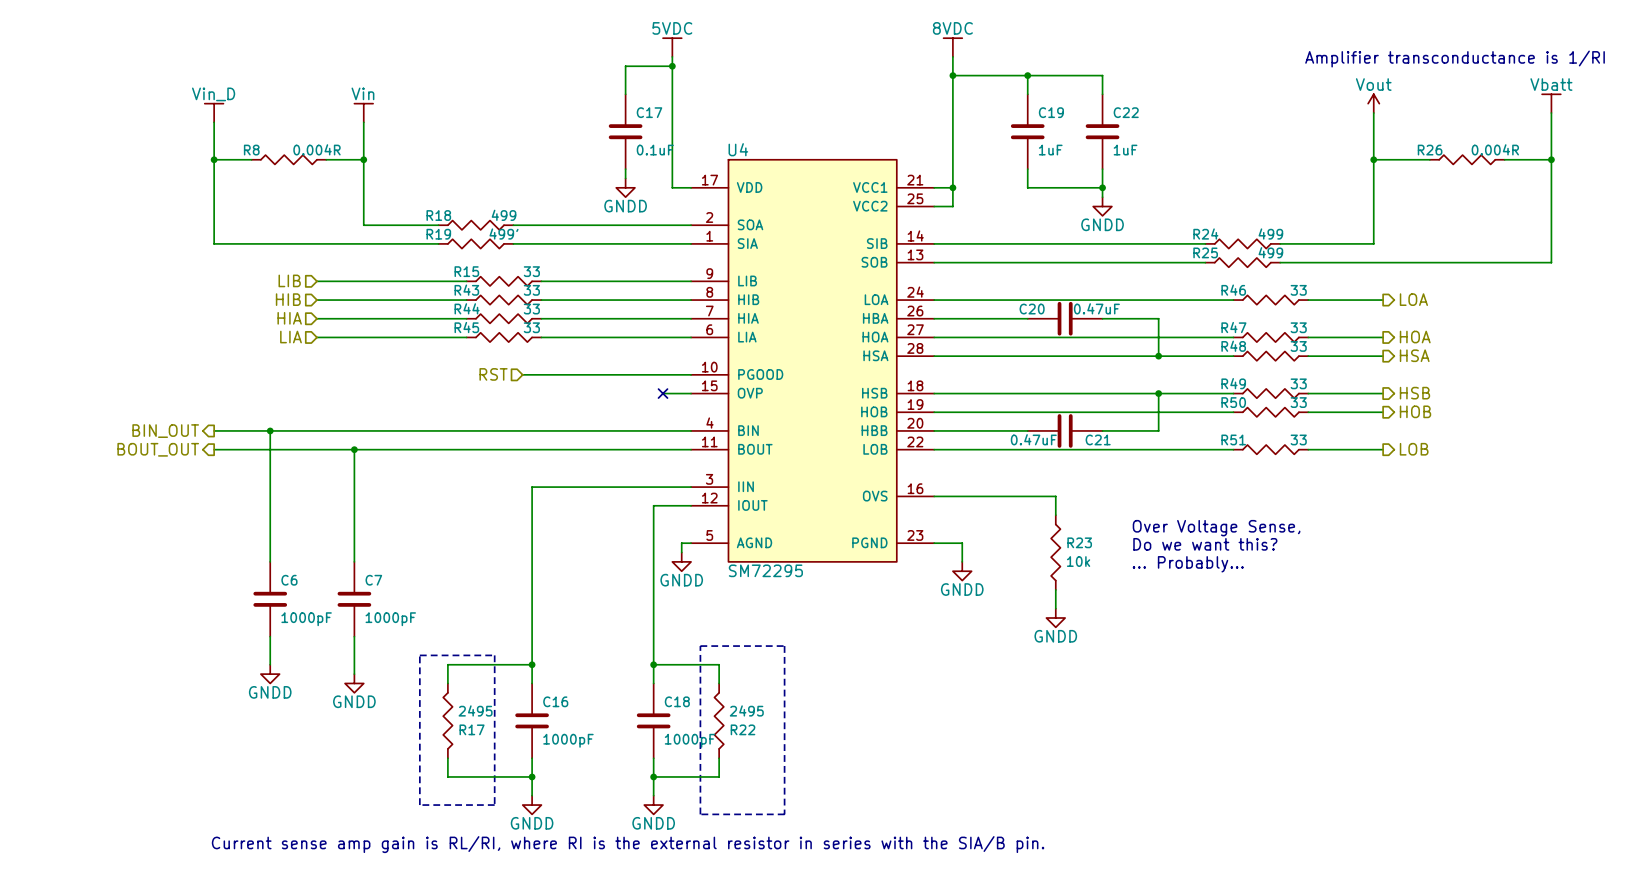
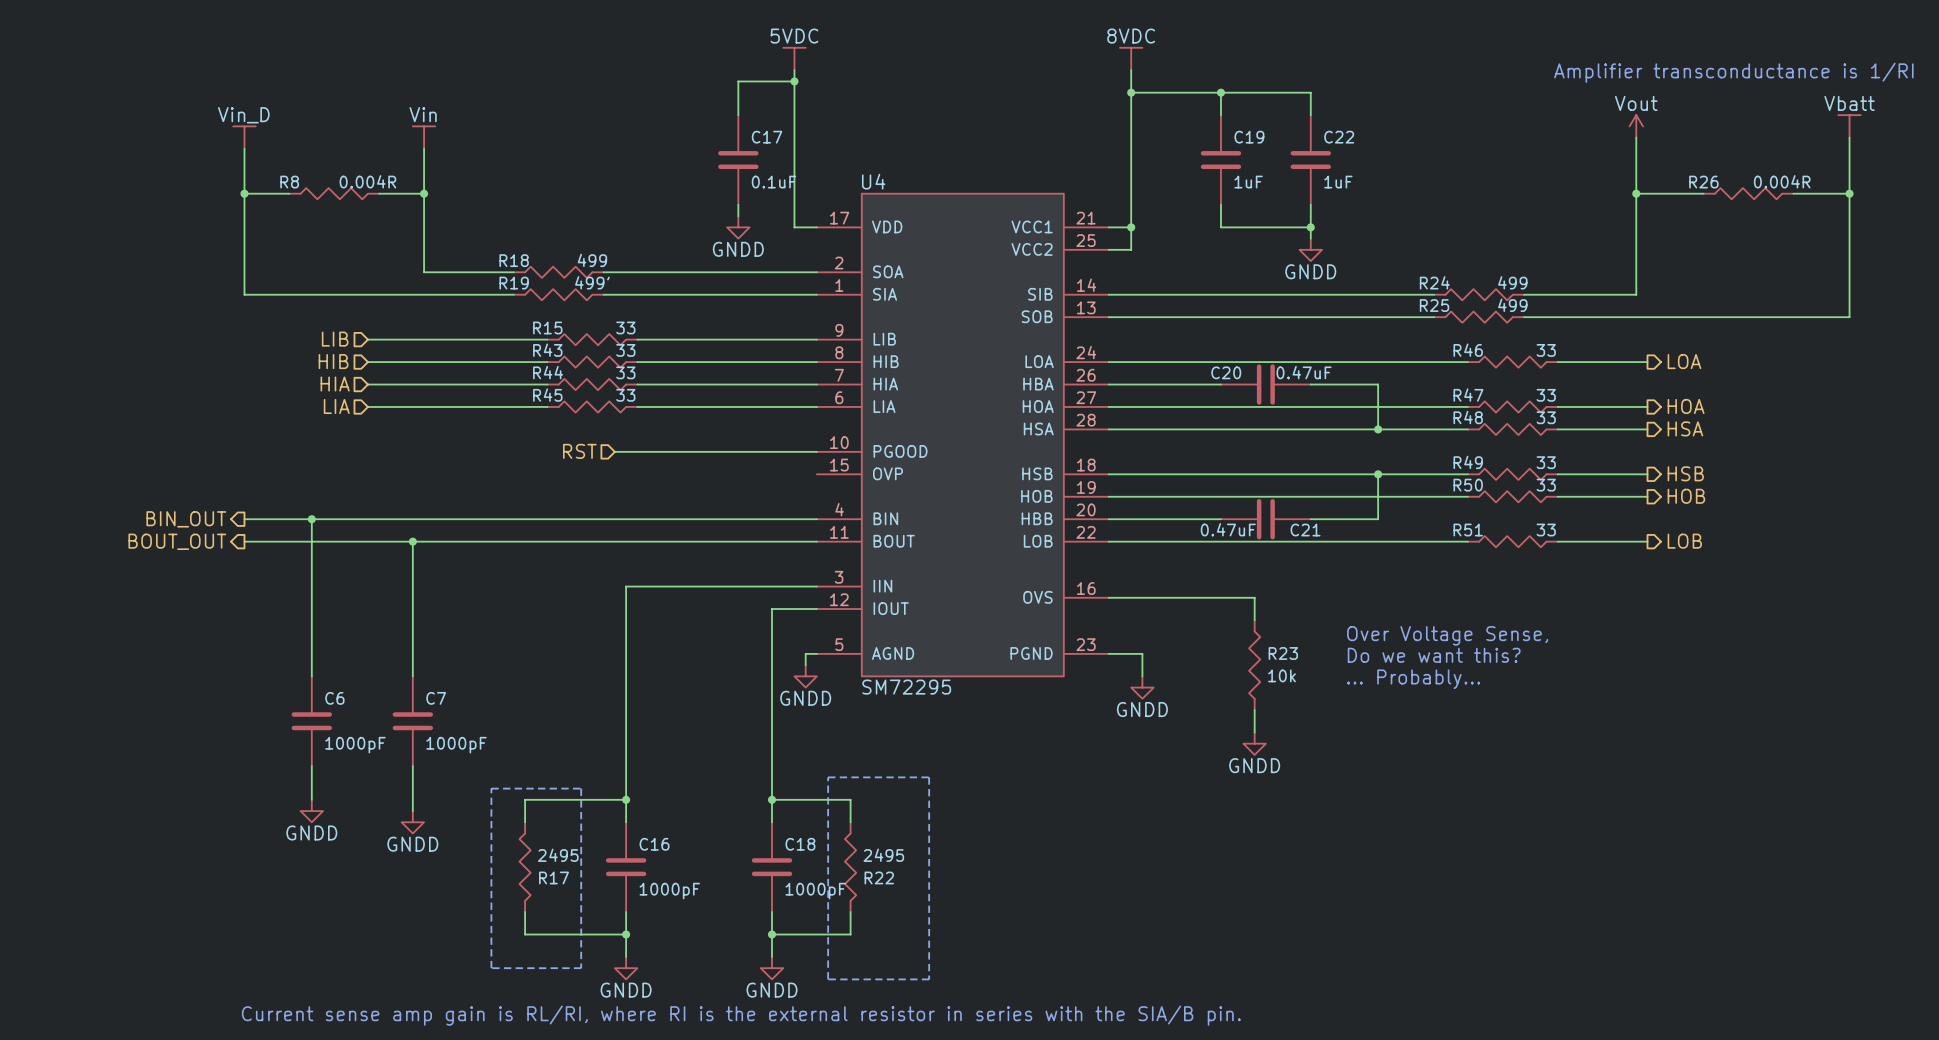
wire: (663, 393) (691, 393) -> none
no-connect mark: (663, 393) -> none

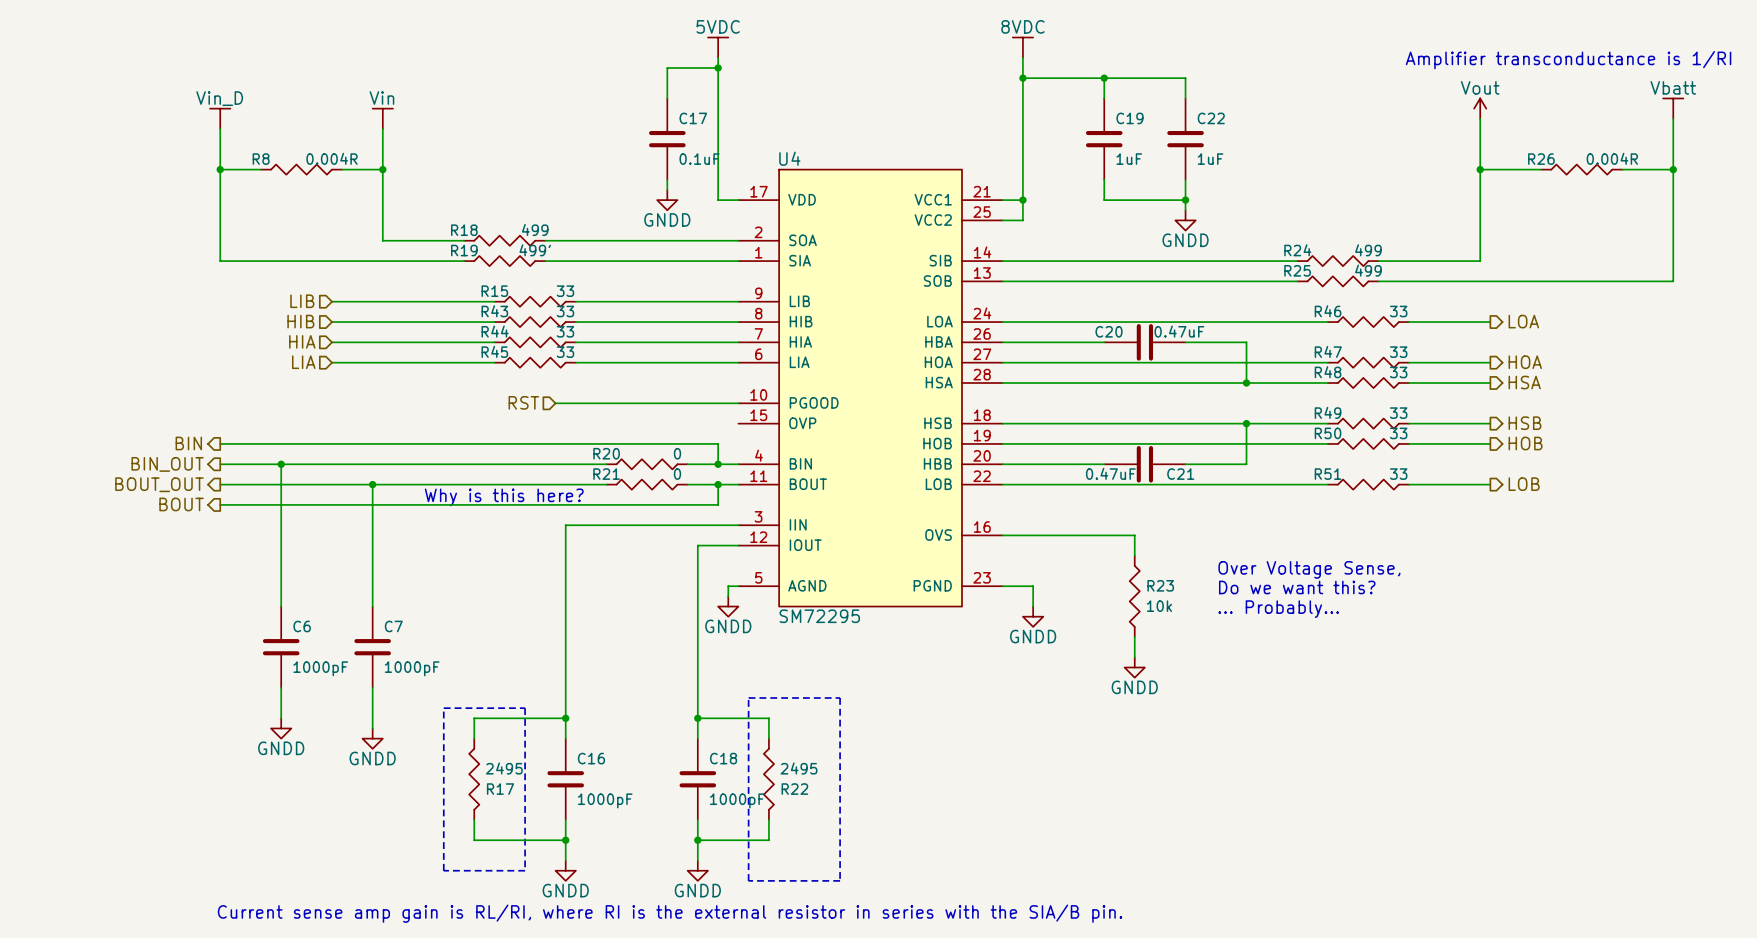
hierarchical label: none -> BIN (188, 443)
wire: none -> (220, 443) (718, 443) (718, 464)
wire: (670, 519) (760, 519) -> none
R20: none -> 0 (647, 464)
junction: none -> (718, 464)
wire: (670, 541) (760, 541) -> none
R21: none -> 0 (647, 484)
wire: none -> (718, 484) (718, 504) (220, 504)
junction: none -> (718, 484)
text: none -> Why is this here? (504, 497)
hierarchical label: none -> BOUT (181, 504)

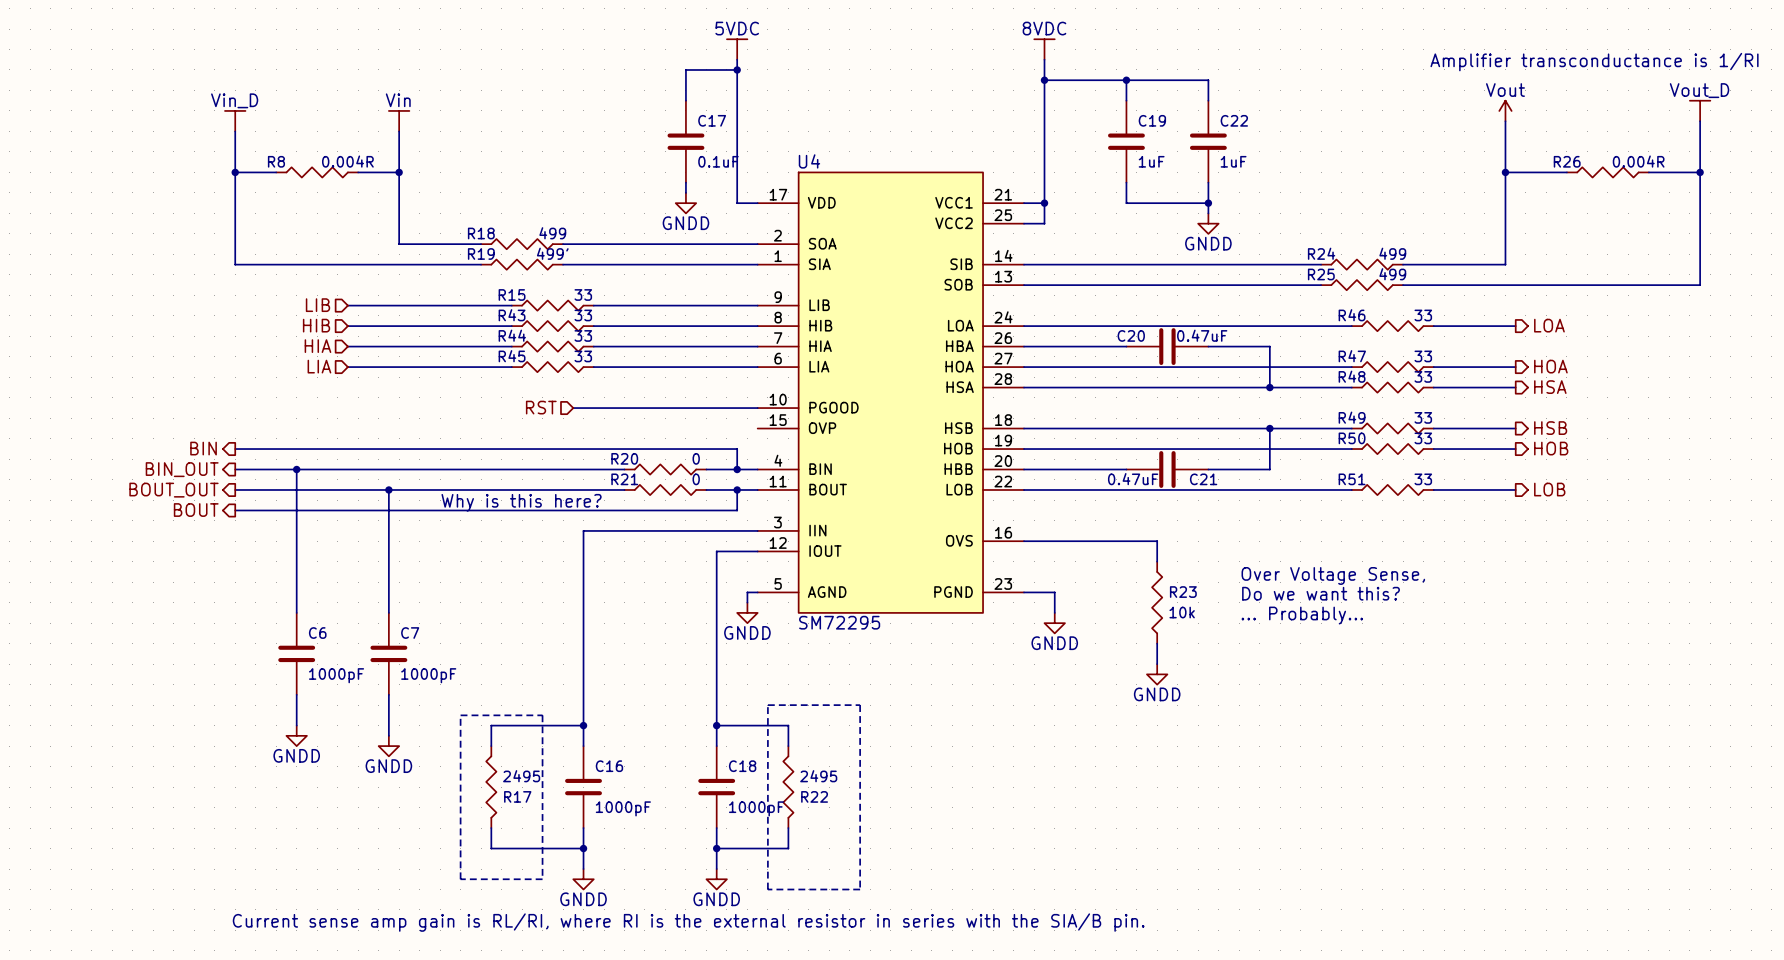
power symbol: Vbatt (1673, 108) -> Vout_D (1700, 110)

